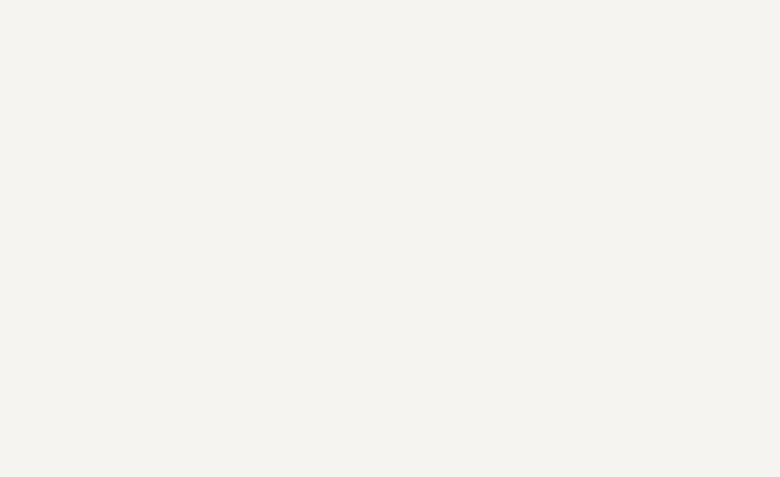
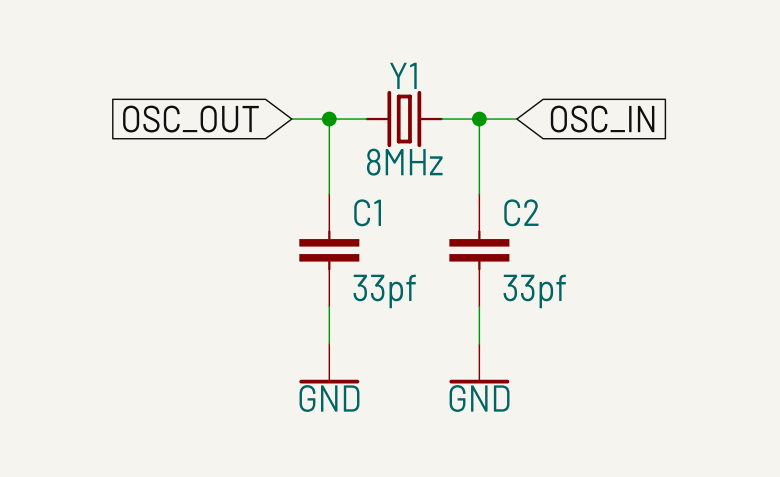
global label: none -> OSC_OUT (190, 119)
wire: none -> (291, 119) (366, 119)
wire: none -> (329, 119) (329, 194)
junction: none -> (329, 119)
Y1: none -> 8MHz (404, 119)
wire: none -> (441, 119) (516, 119)
wire: none -> (479, 119) (479, 194)
junction: none -> (479, 119)
global label: none -> OSC_IN (602, 119)
C1: none -> 33pf (329, 250)
C2: none -> 33pf (479, 250)
wire: none -> (329, 306) (329, 344)
wire: none -> (479, 306) (479, 344)
power symbol: none -> GND (329, 363)
power symbol: none -> GND (479, 363)

